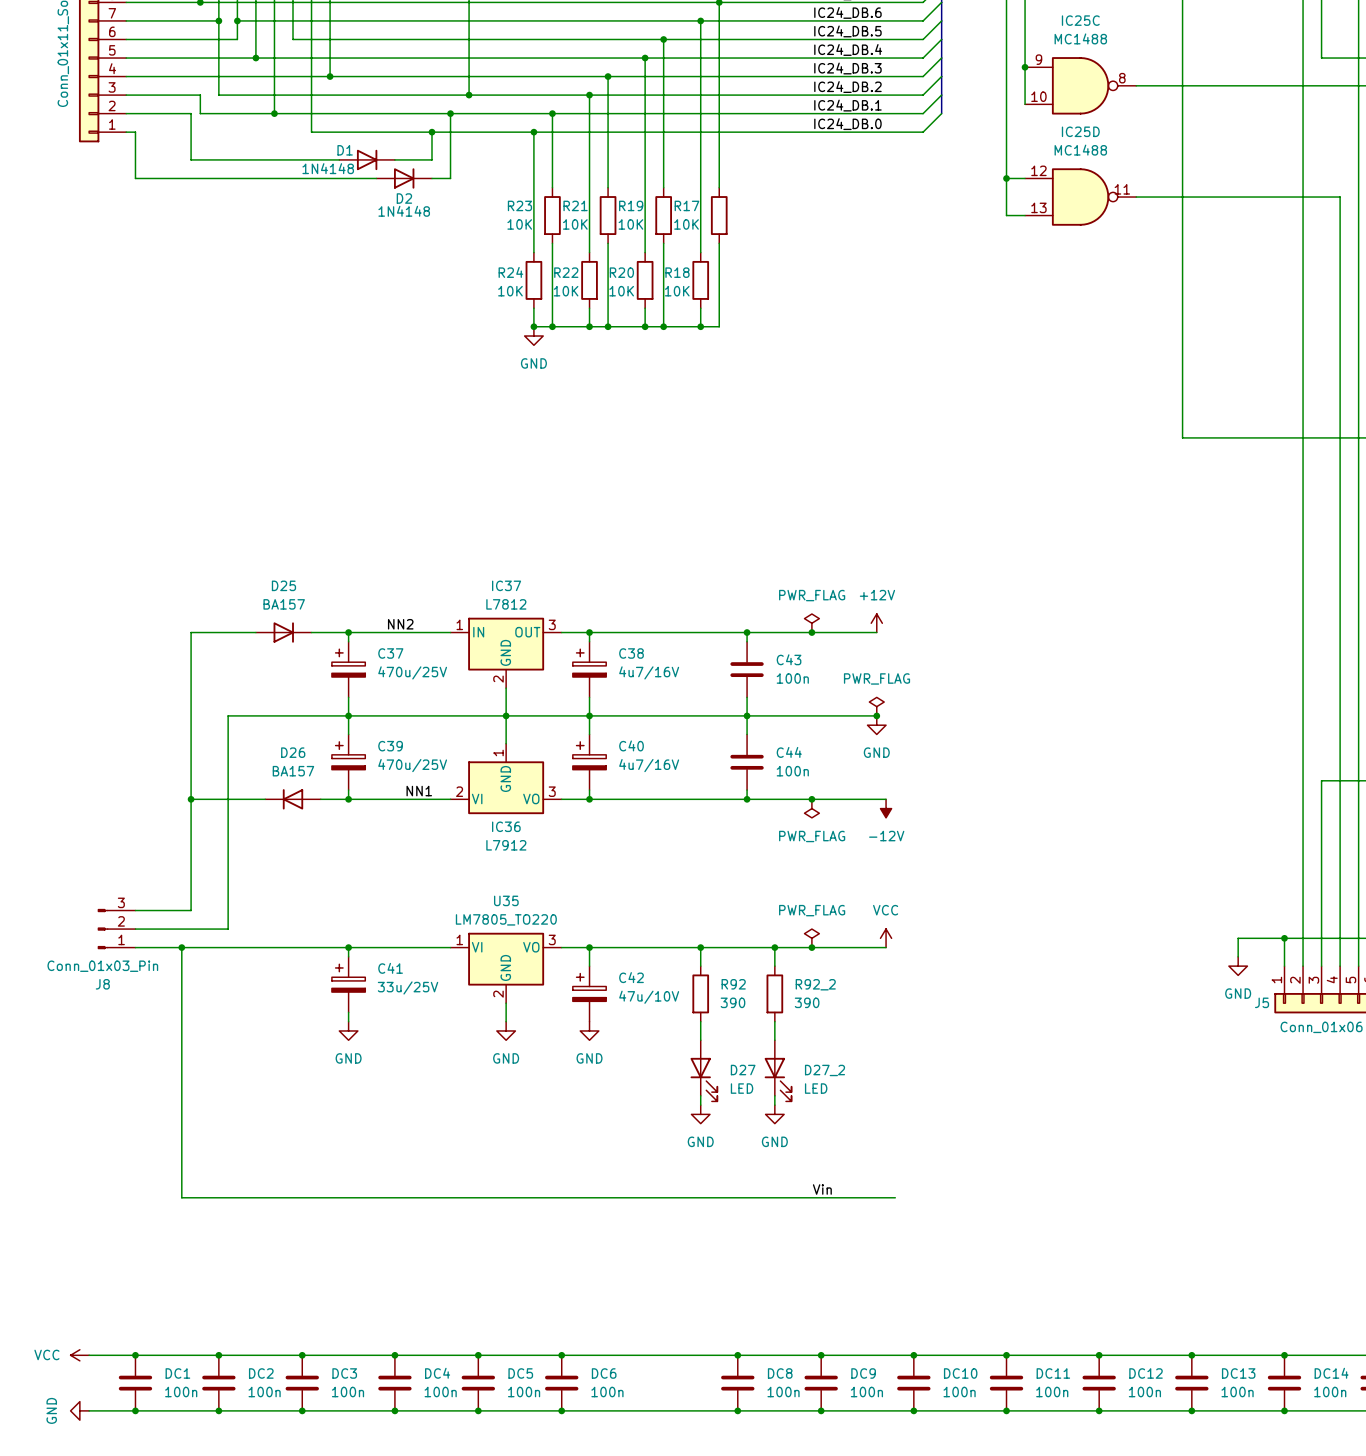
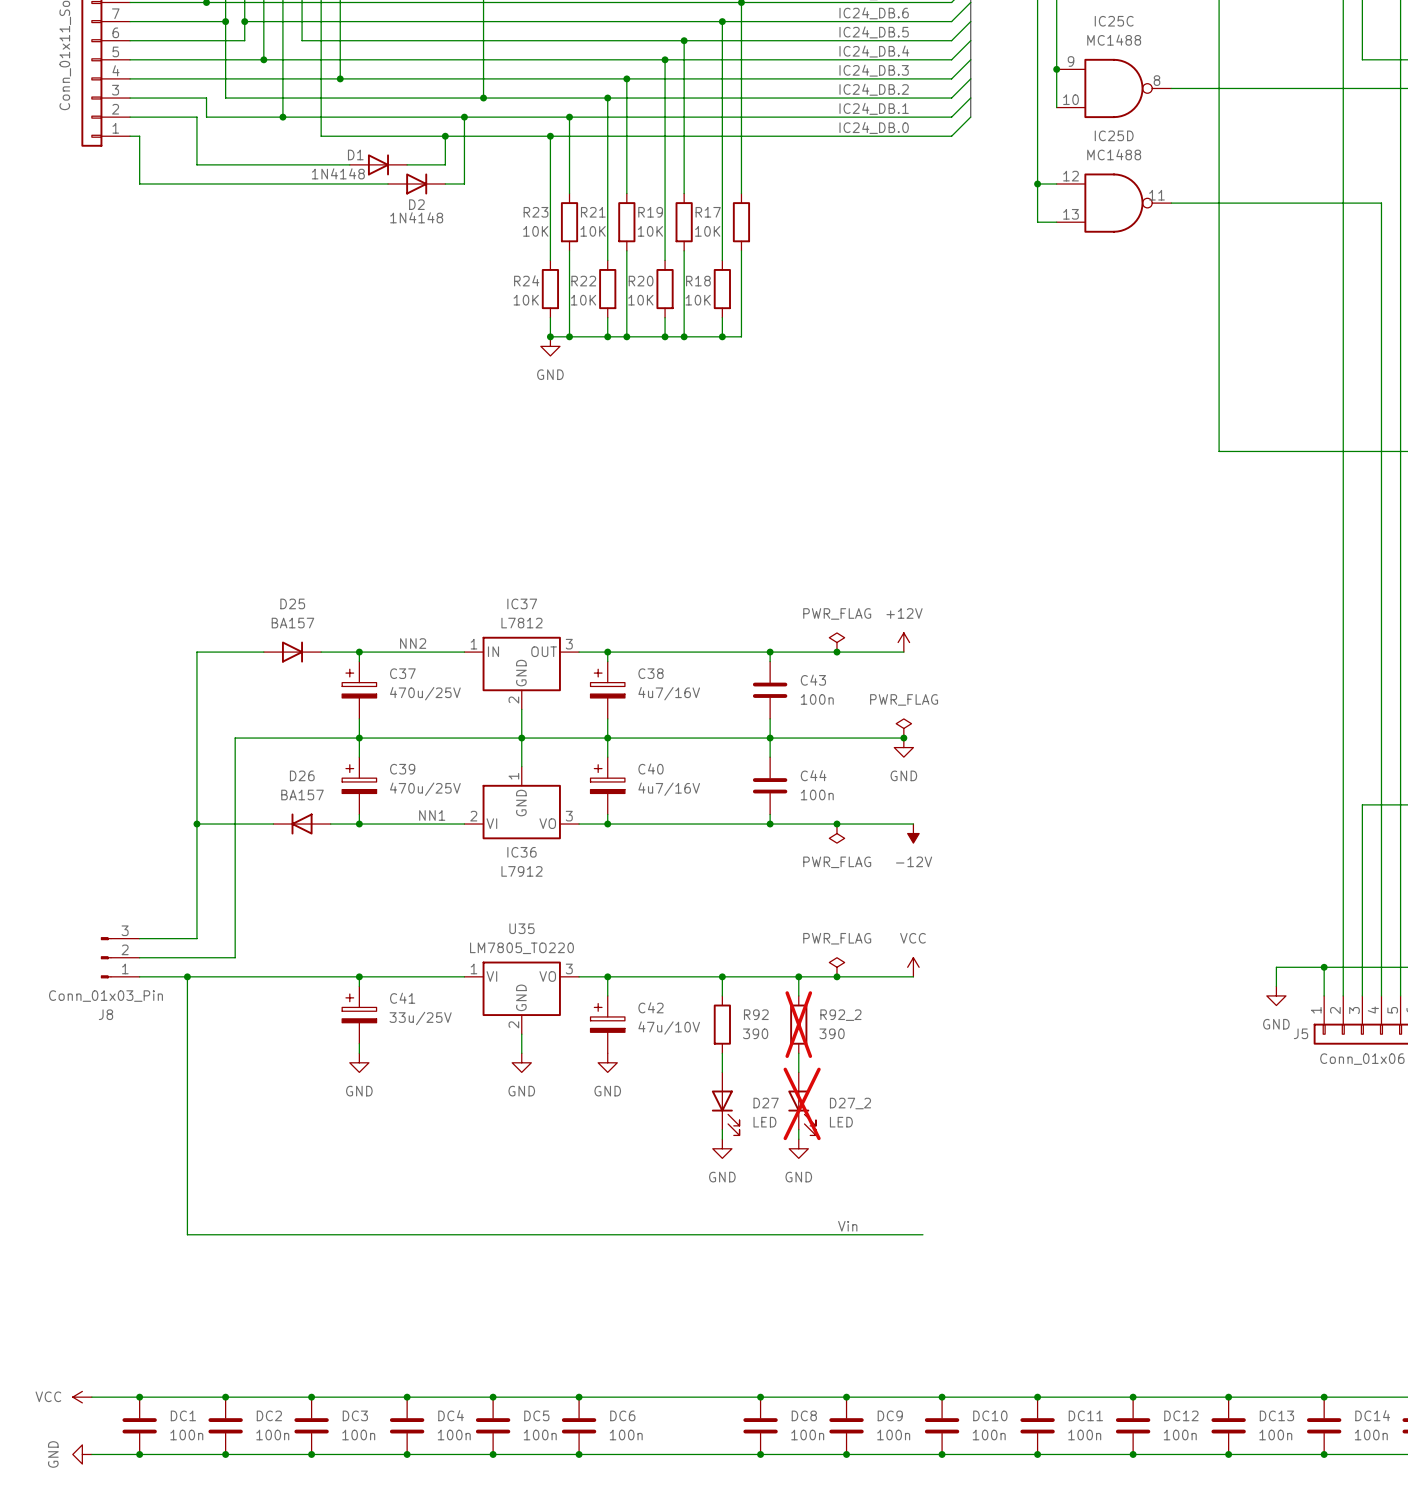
R92_2 do-not-place cross: none -> (798, 1024)
D27_2 do-not-place cross: none -> (802, 1103)

